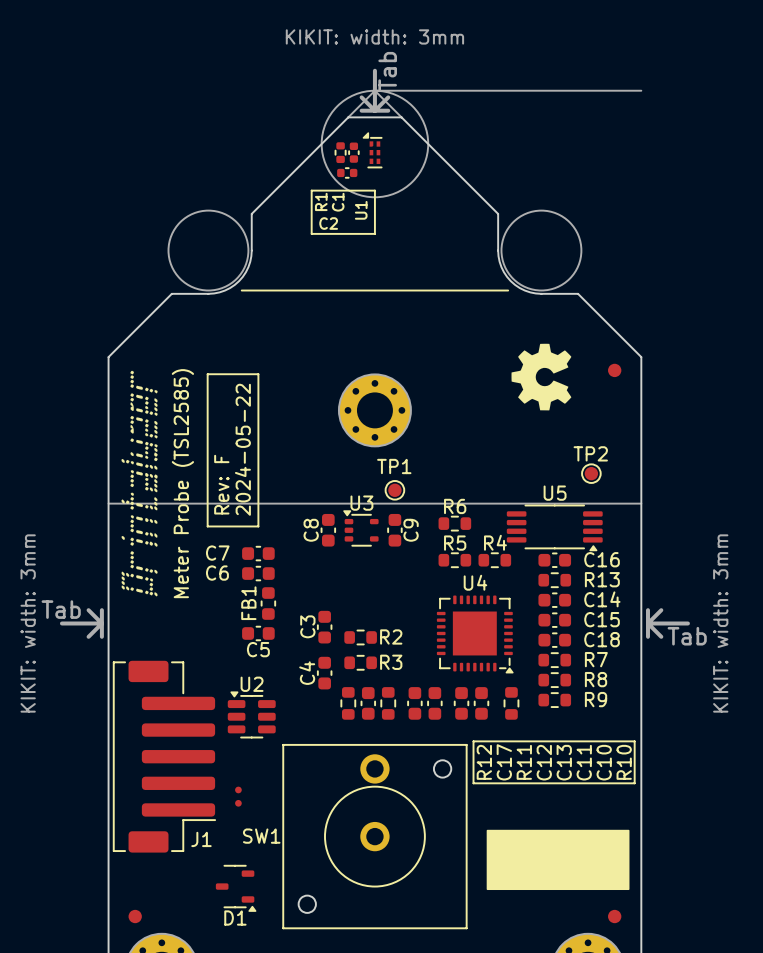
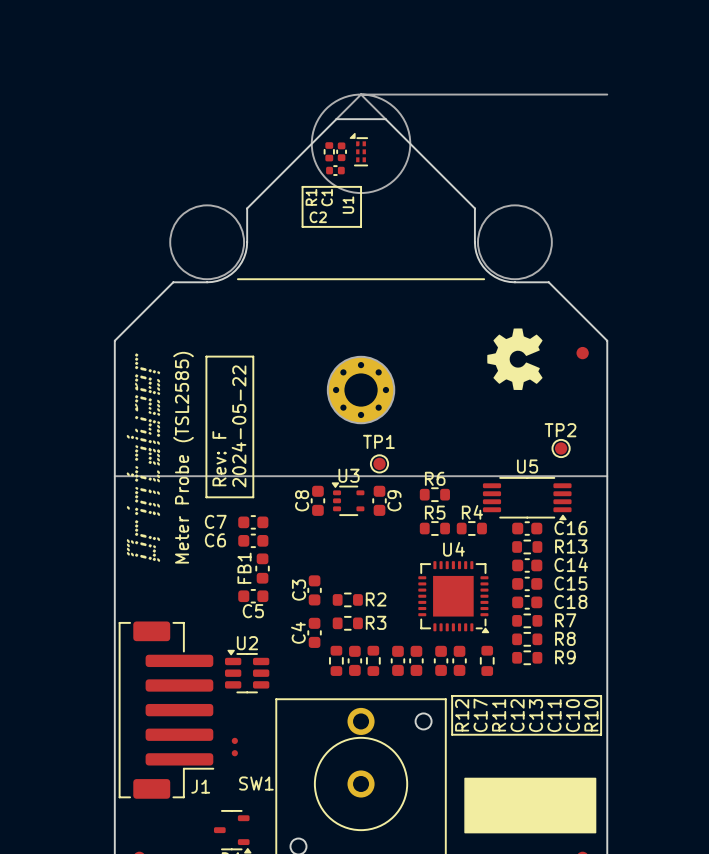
drawing: [359, 68, 391, 113] -> none
drawing: [59, 608, 104, 639] -> none
drawing: [645, 608, 690, 639] -> none

